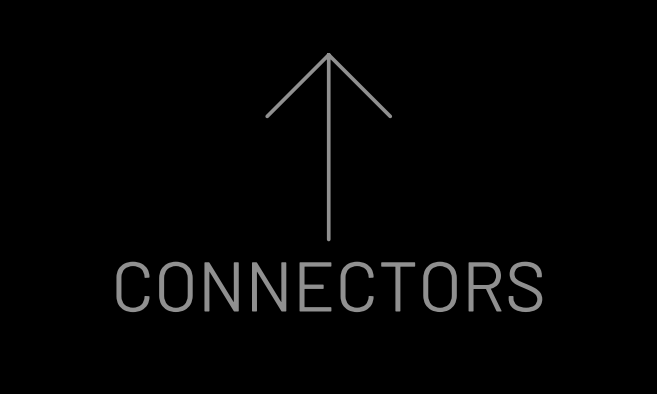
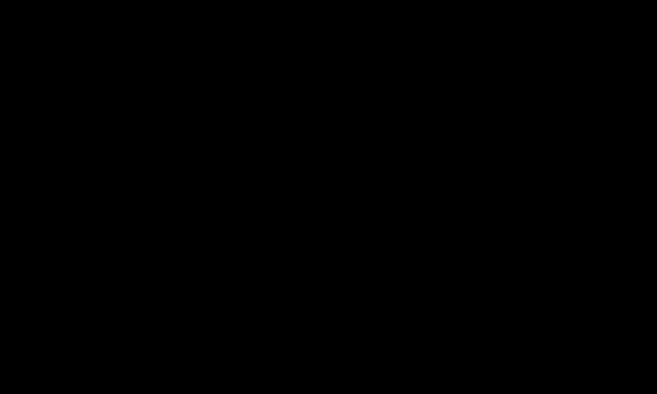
line: (328, 54) (267, 116) -> none
line: (328, 54) (390, 116) -> none
line: (328, 54) (328, 239) -> none
text: CONNECTORS (329, 286) -> none

